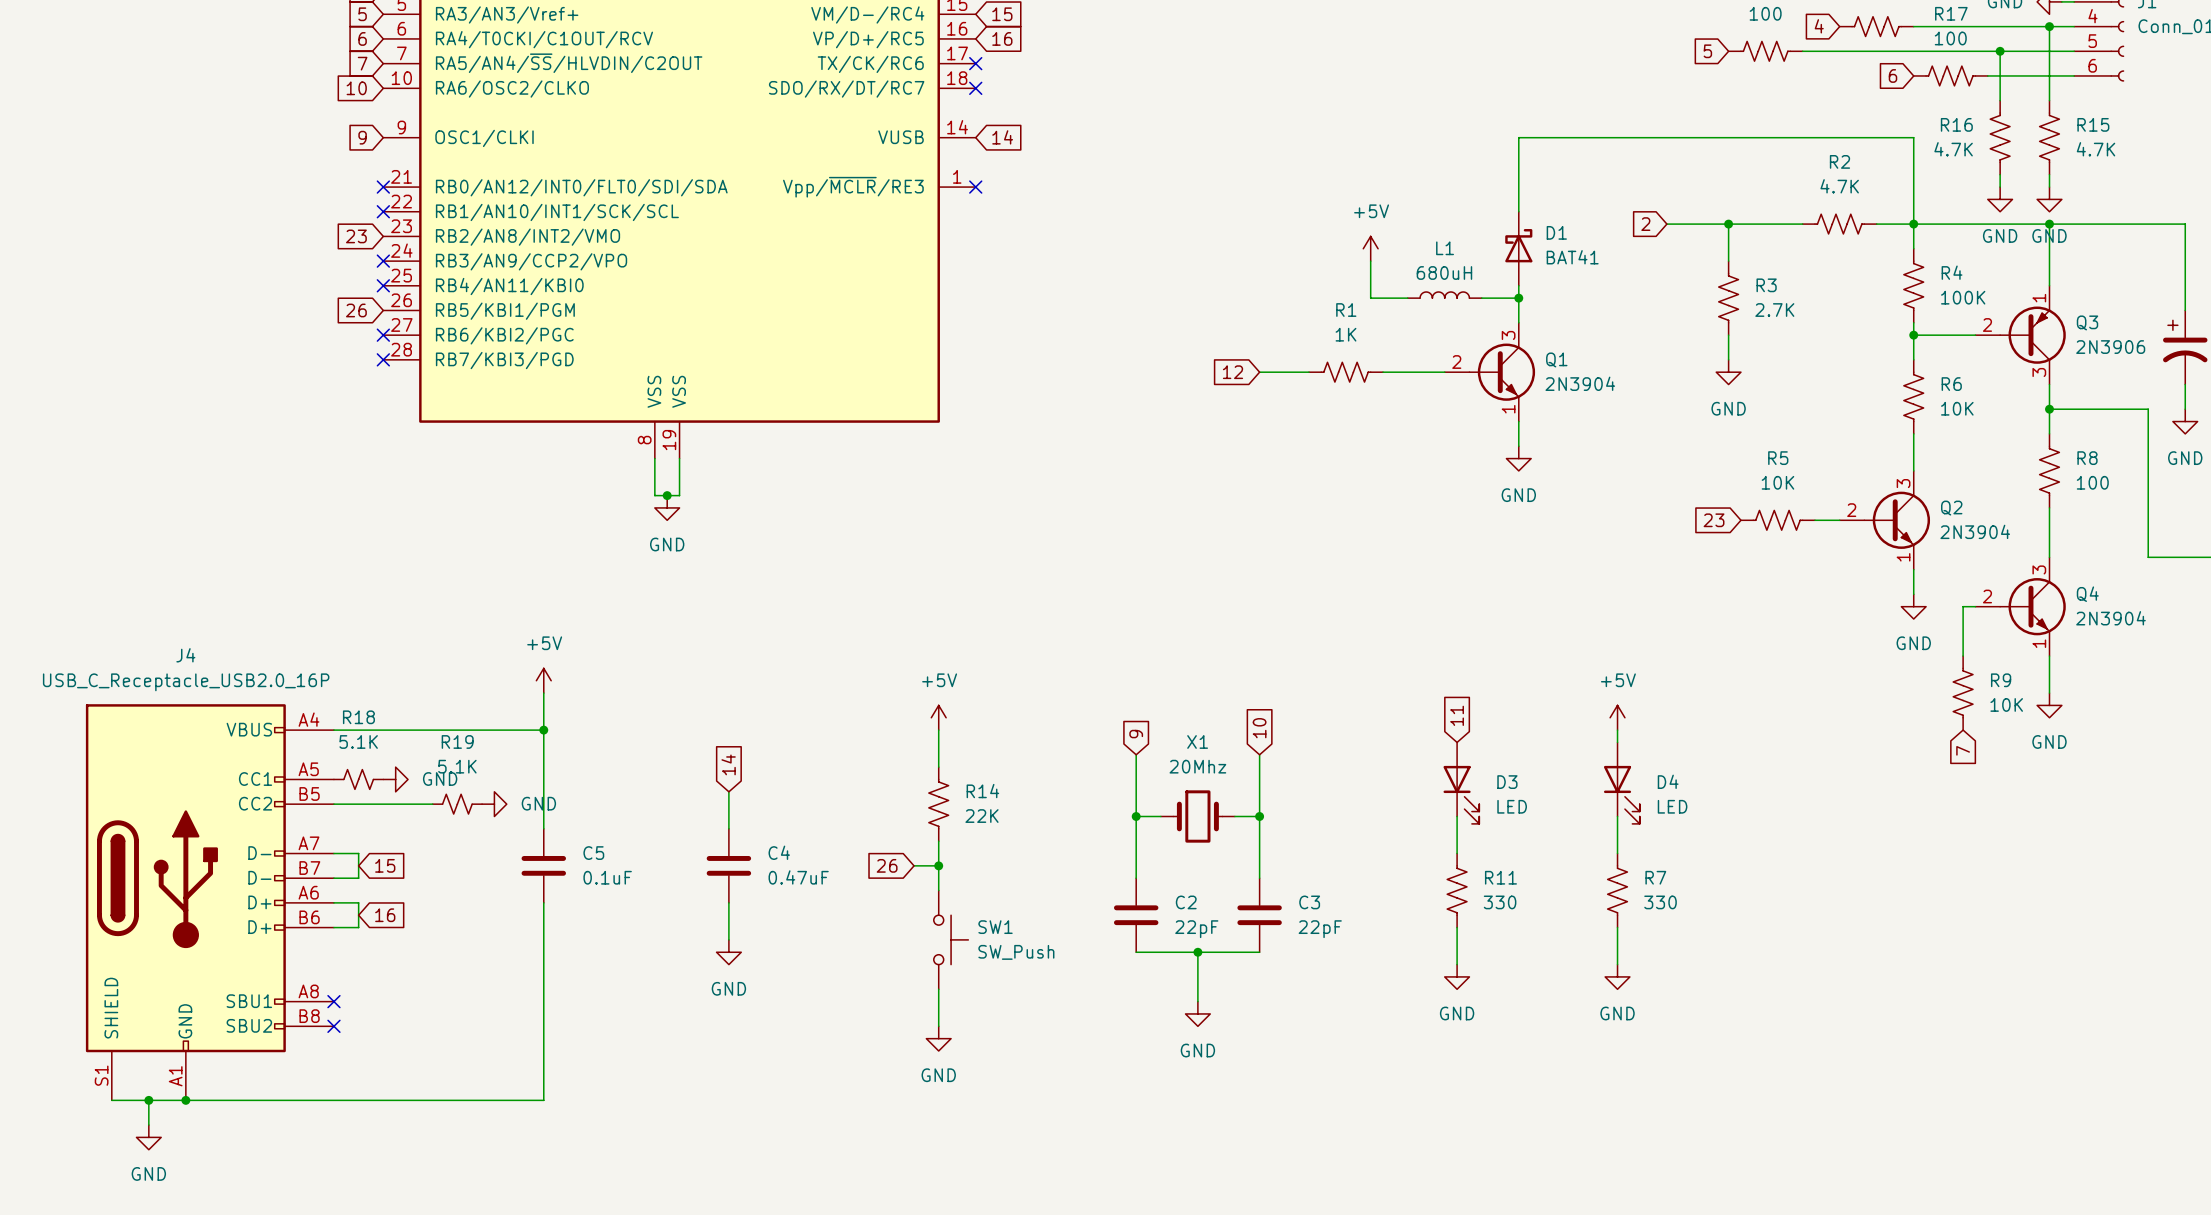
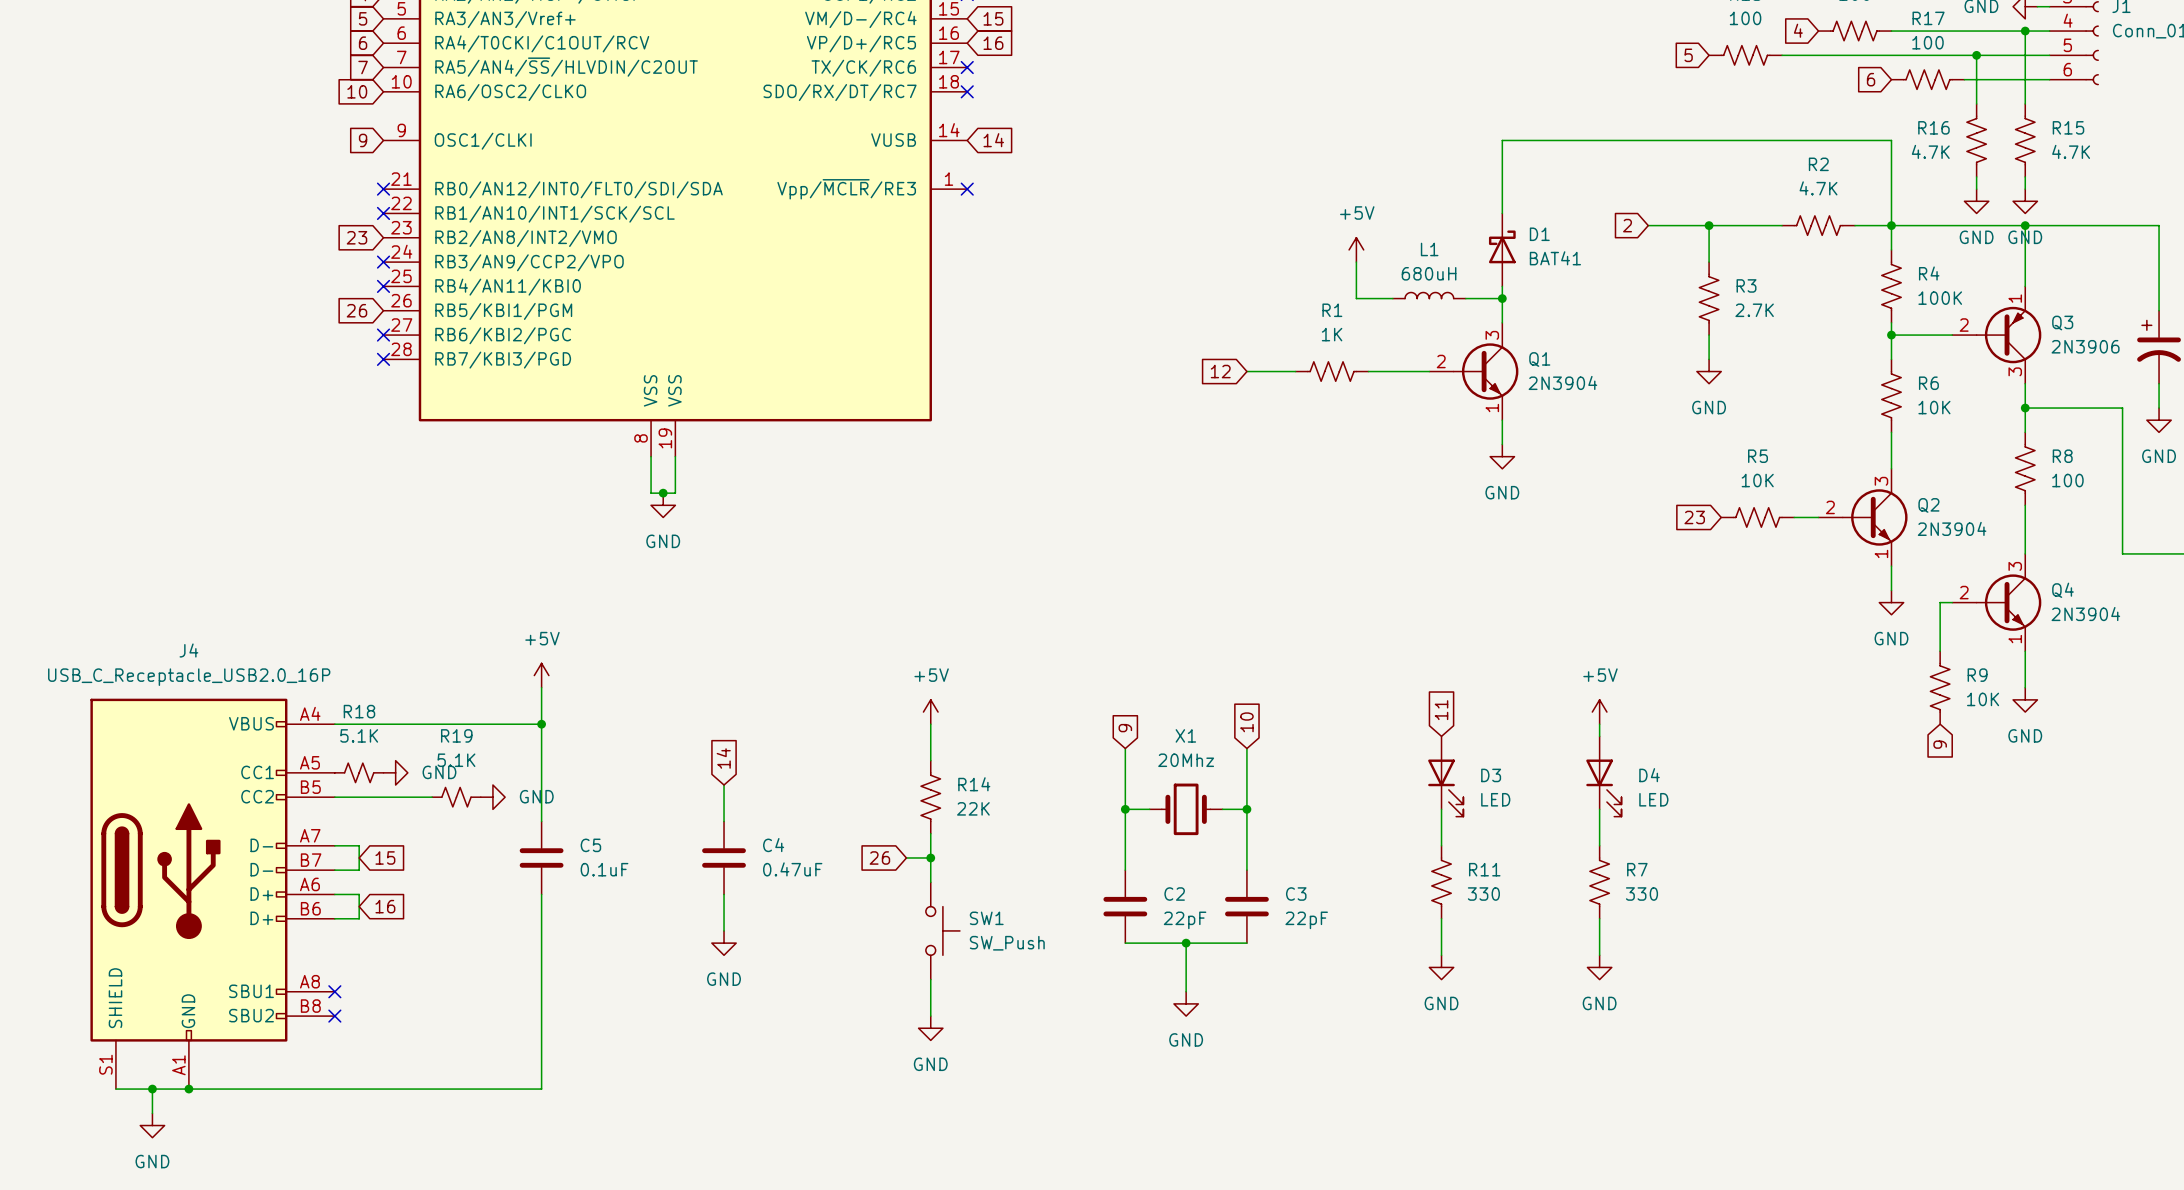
global label: 7 (1963, 750) -> 9 (1940, 744)

